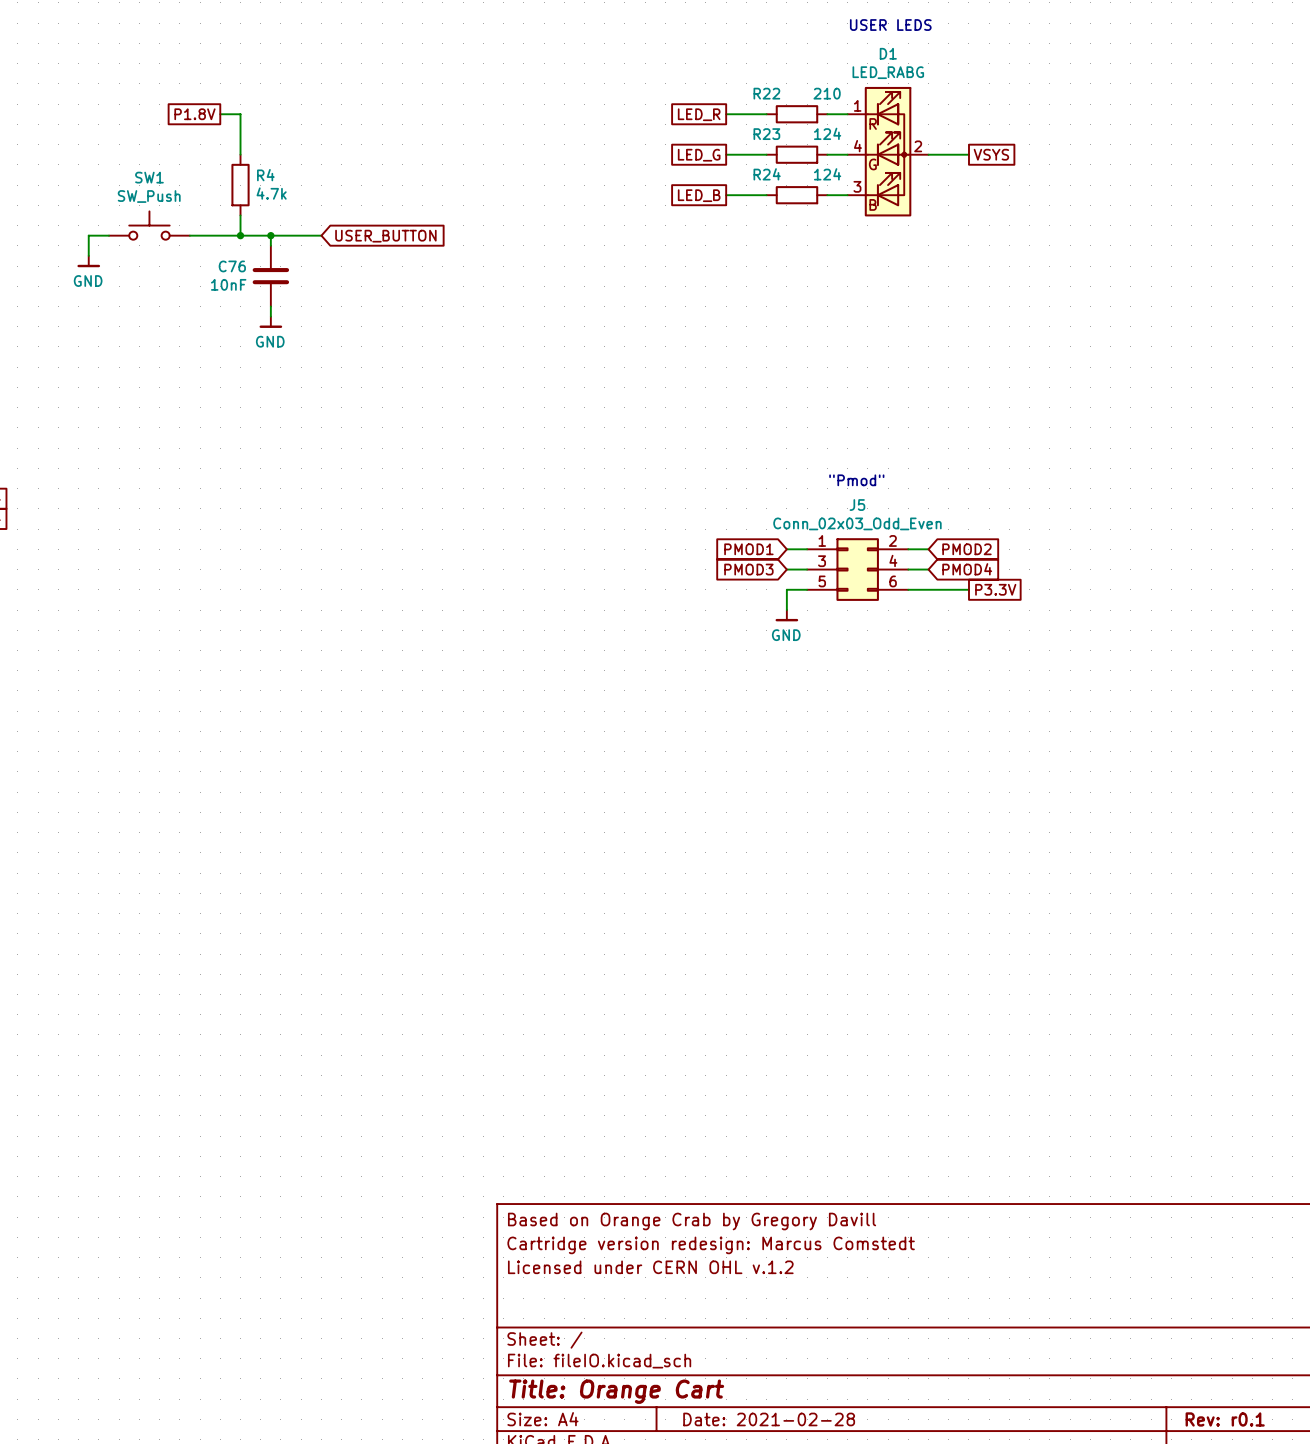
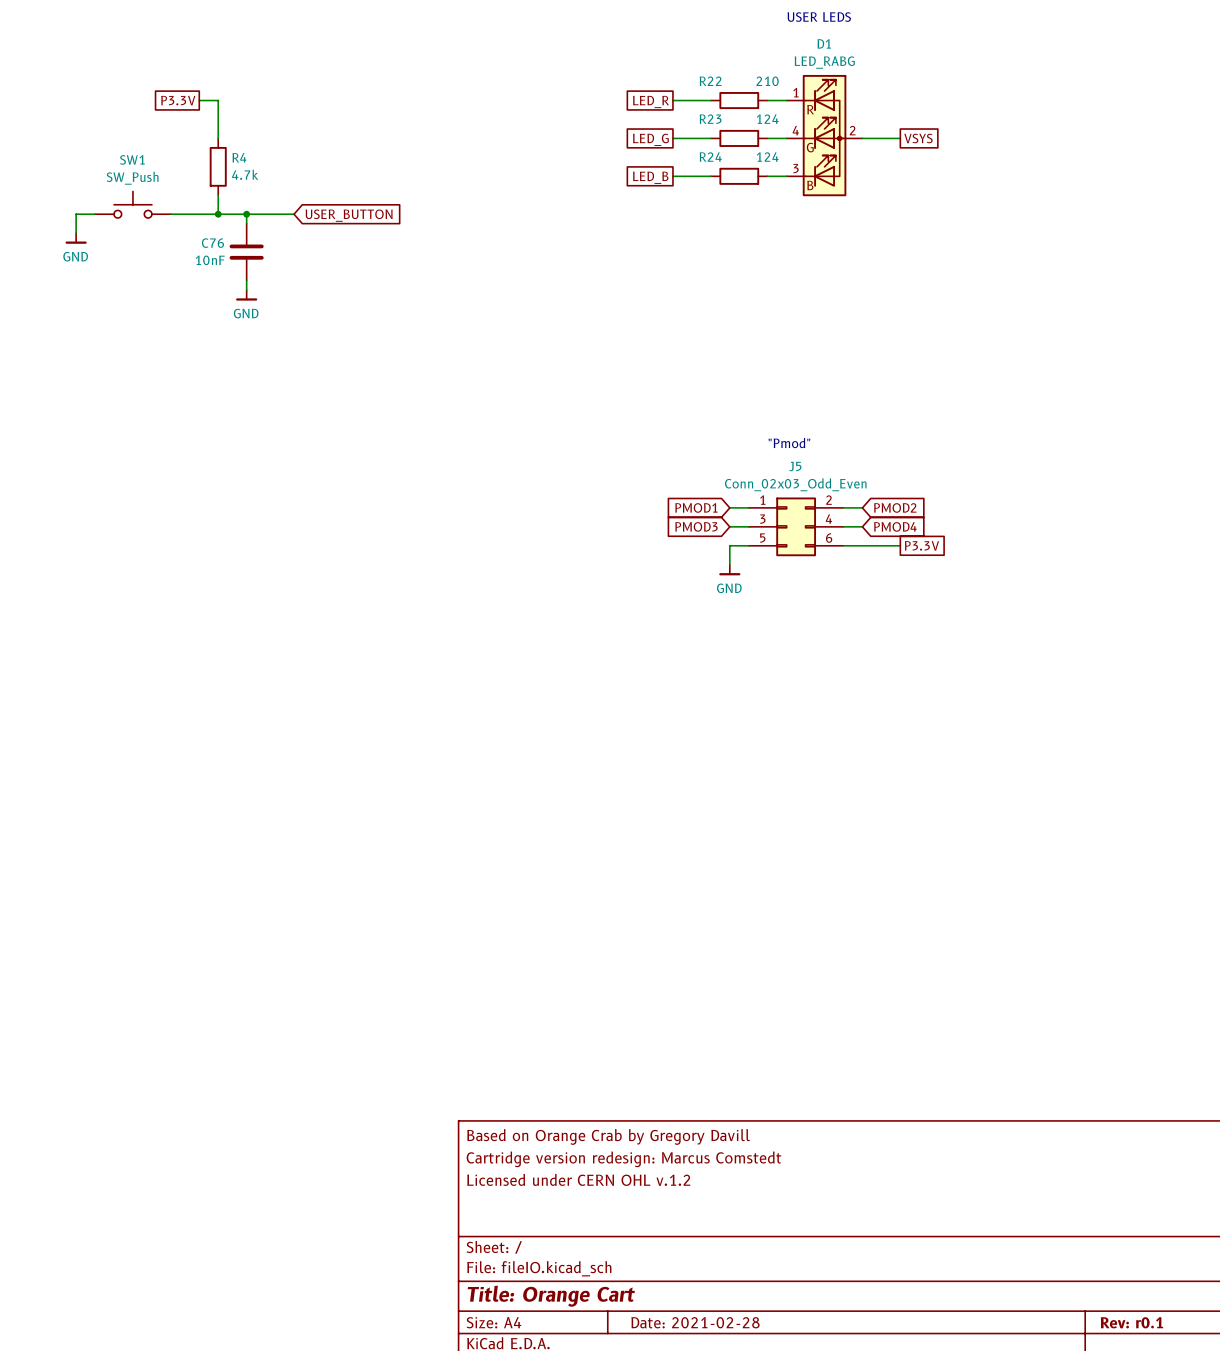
global label: P1.8V (194, 114) -> P3.3V (178, 100)

